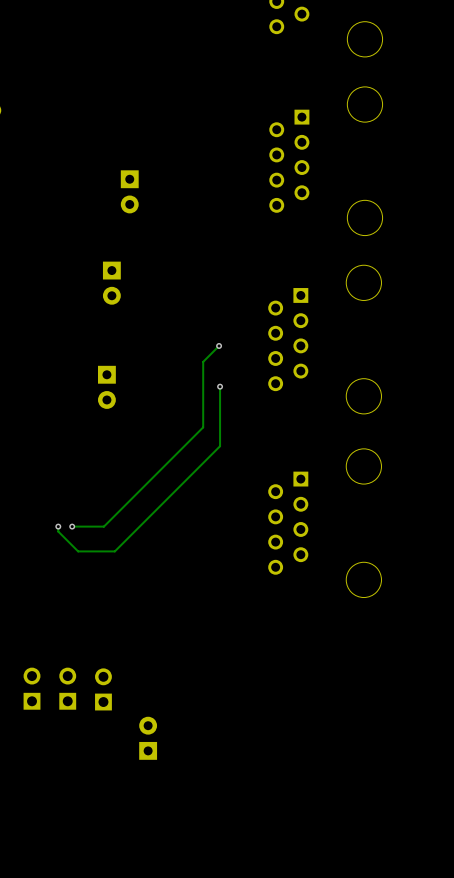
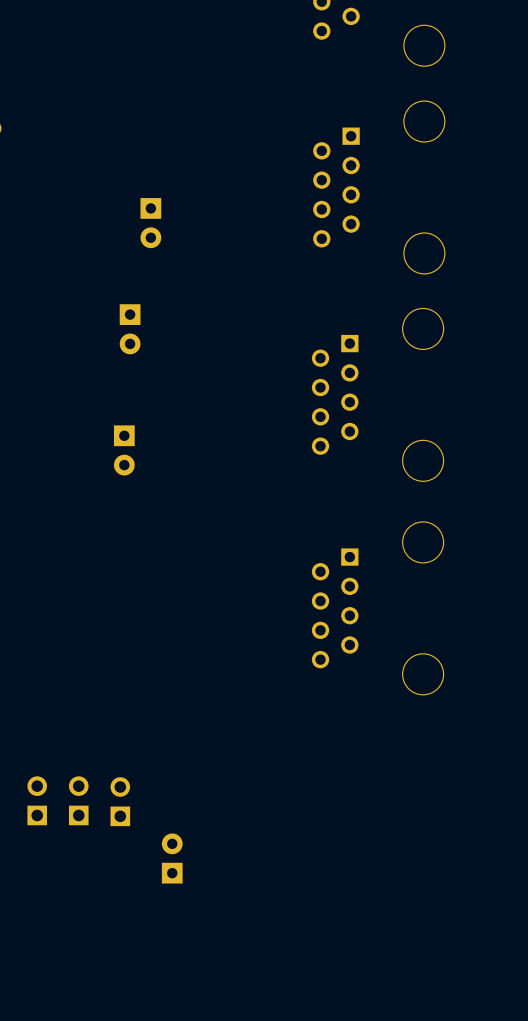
track: (219, 345) (203, 361) (203, 427) (103, 526) (72, 526) -> none
via: (219, 345) -> none
track: (220, 386) (220, 446) (114, 551) (78, 551) (58, 531) (58, 526) -> none
via: (220, 386) -> none
via: (58, 526) -> none
via: (72, 526) -> none

